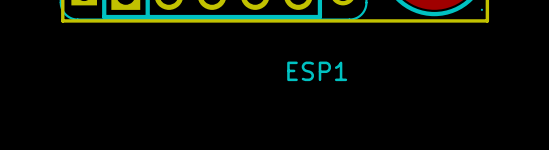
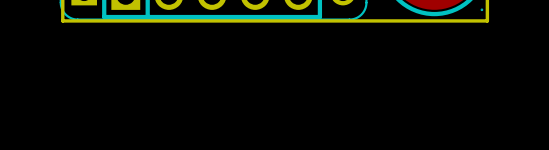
ESP1 name: ESP1 (317, 71) -> none

